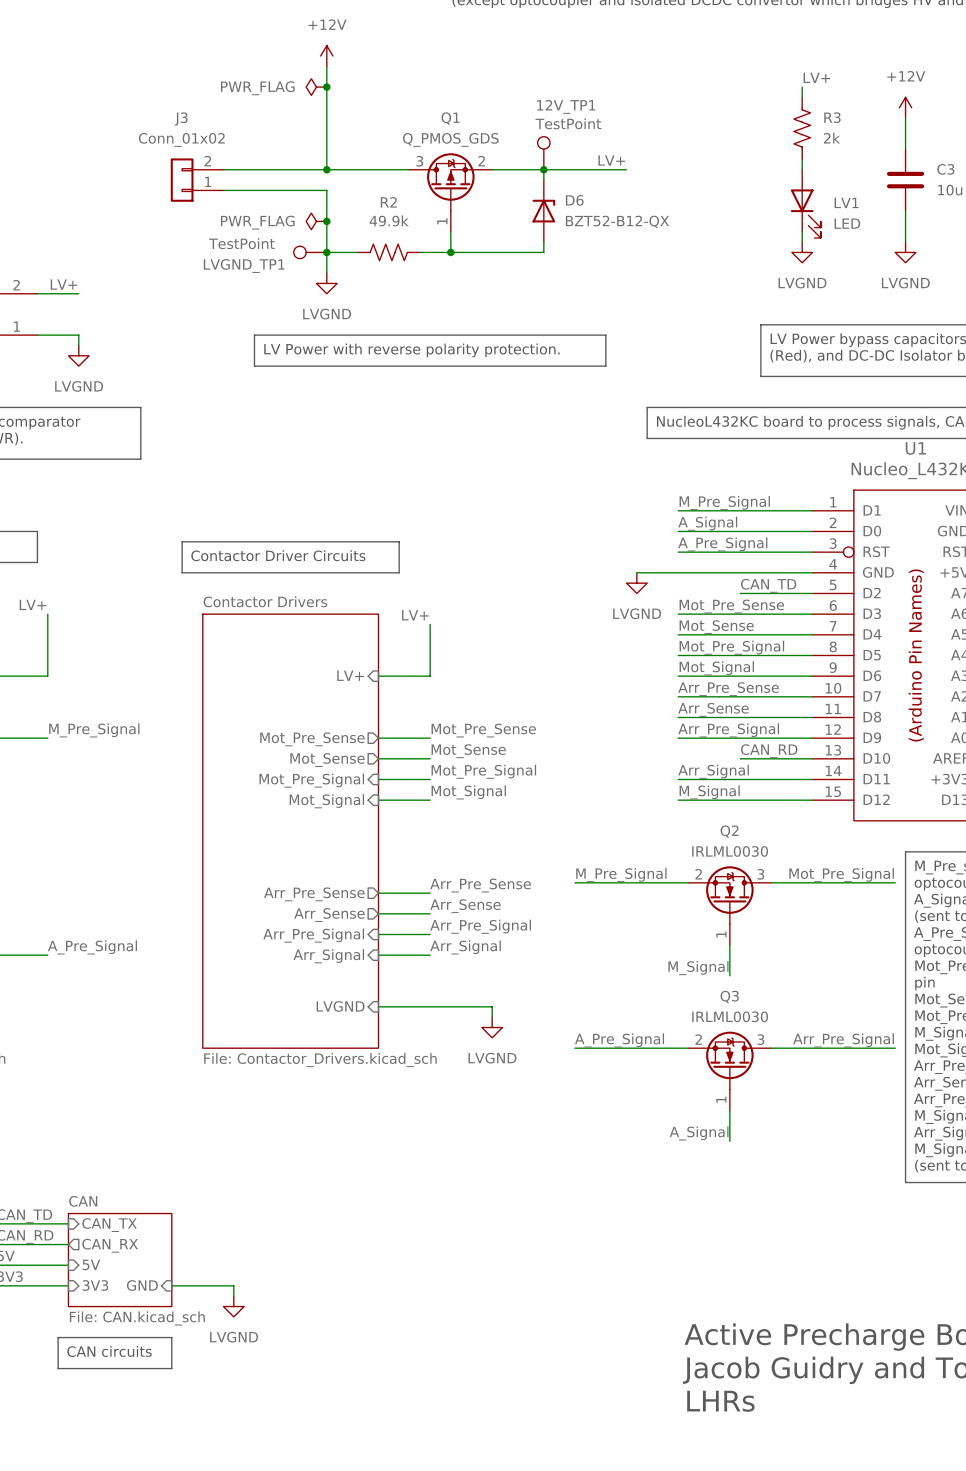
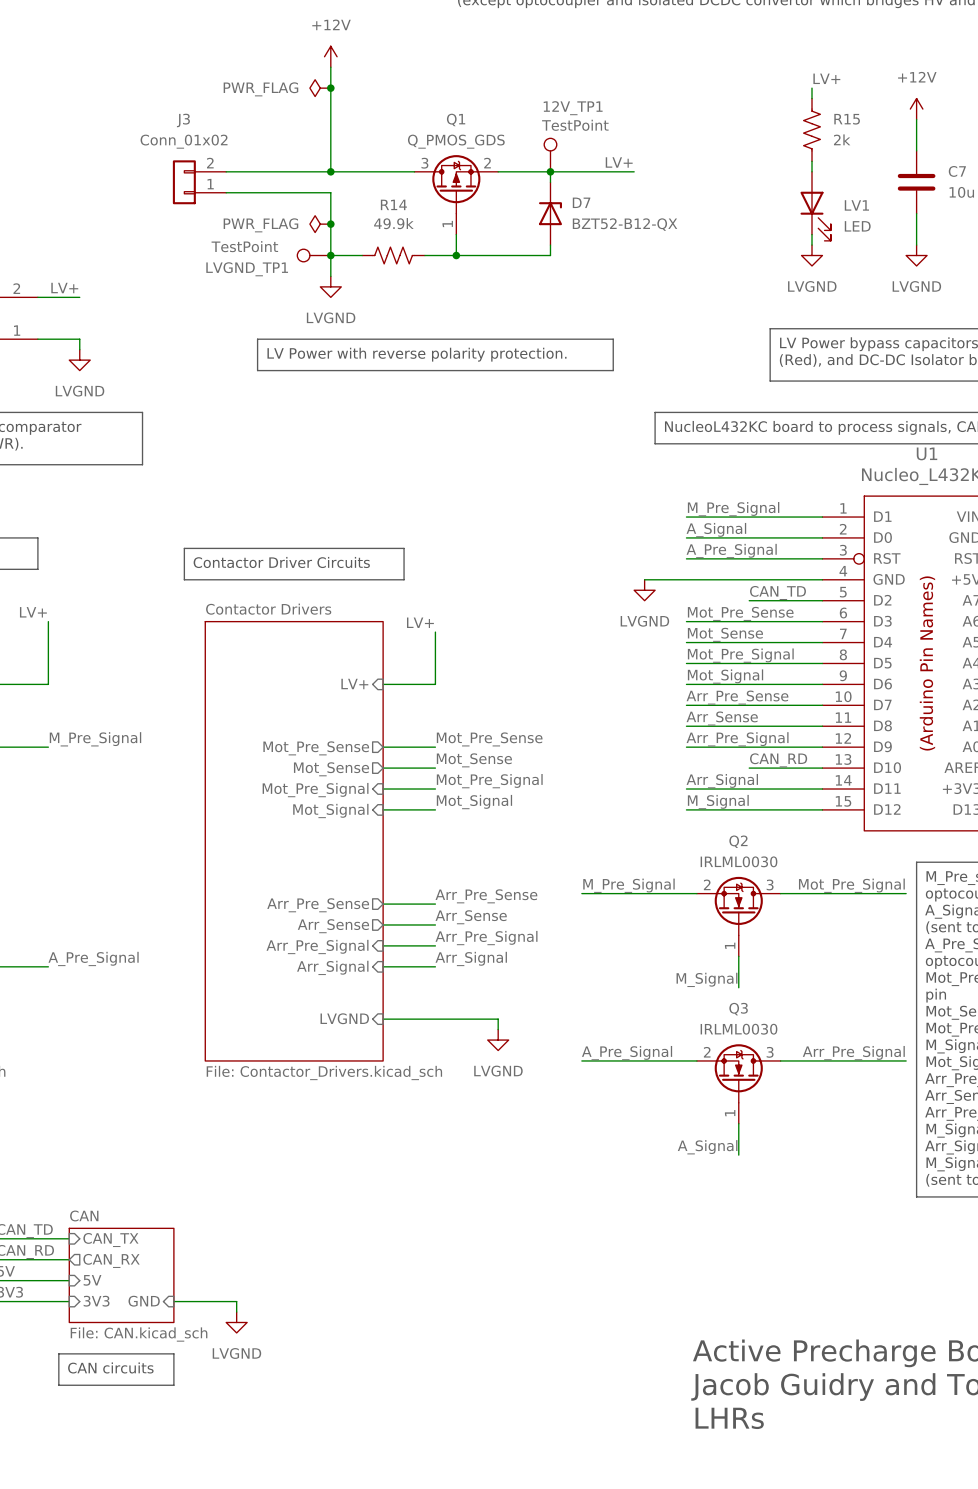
R3 name: R3 (832, 117) -> R15 (847, 119)
C3 name: C3 (945, 169) -> C7 (957, 171)
D6 name: D6 (574, 200) -> D7 (581, 202)
R2 name: R2 (388, 202) -> R14 (393, 204)

